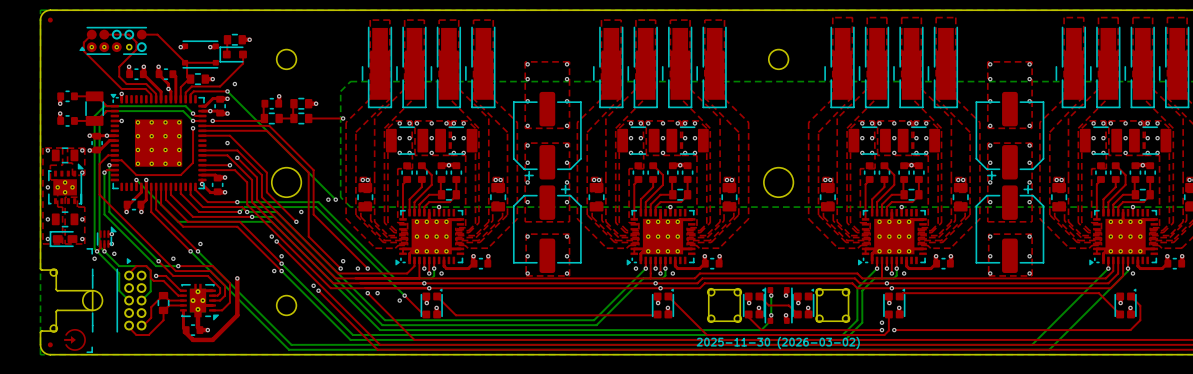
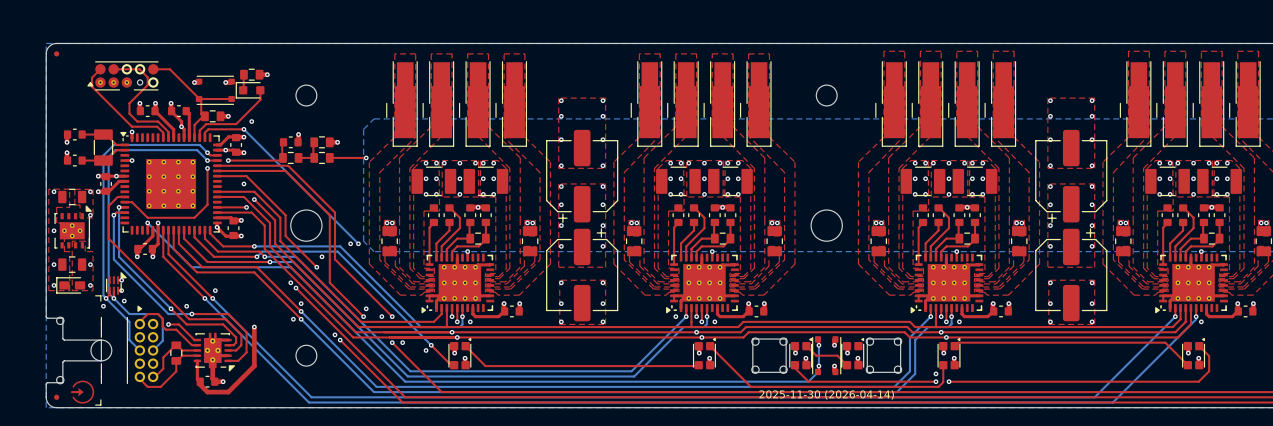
drawing shape: [696, 336, 860, 350] -> [759, 390, 894, 400]

